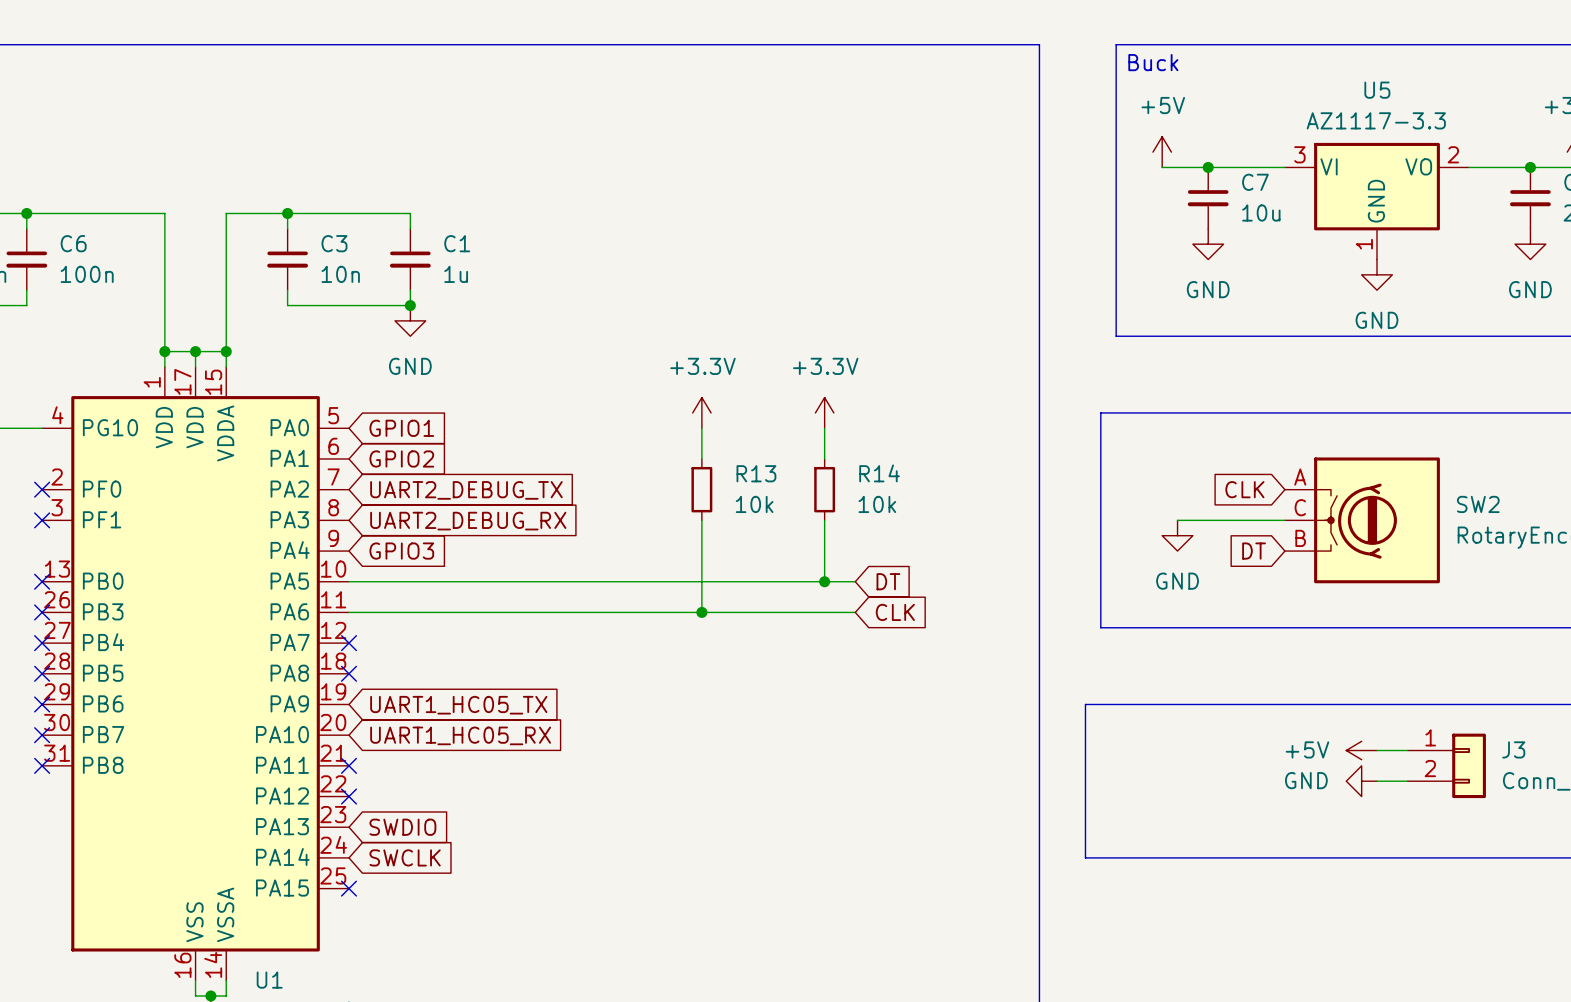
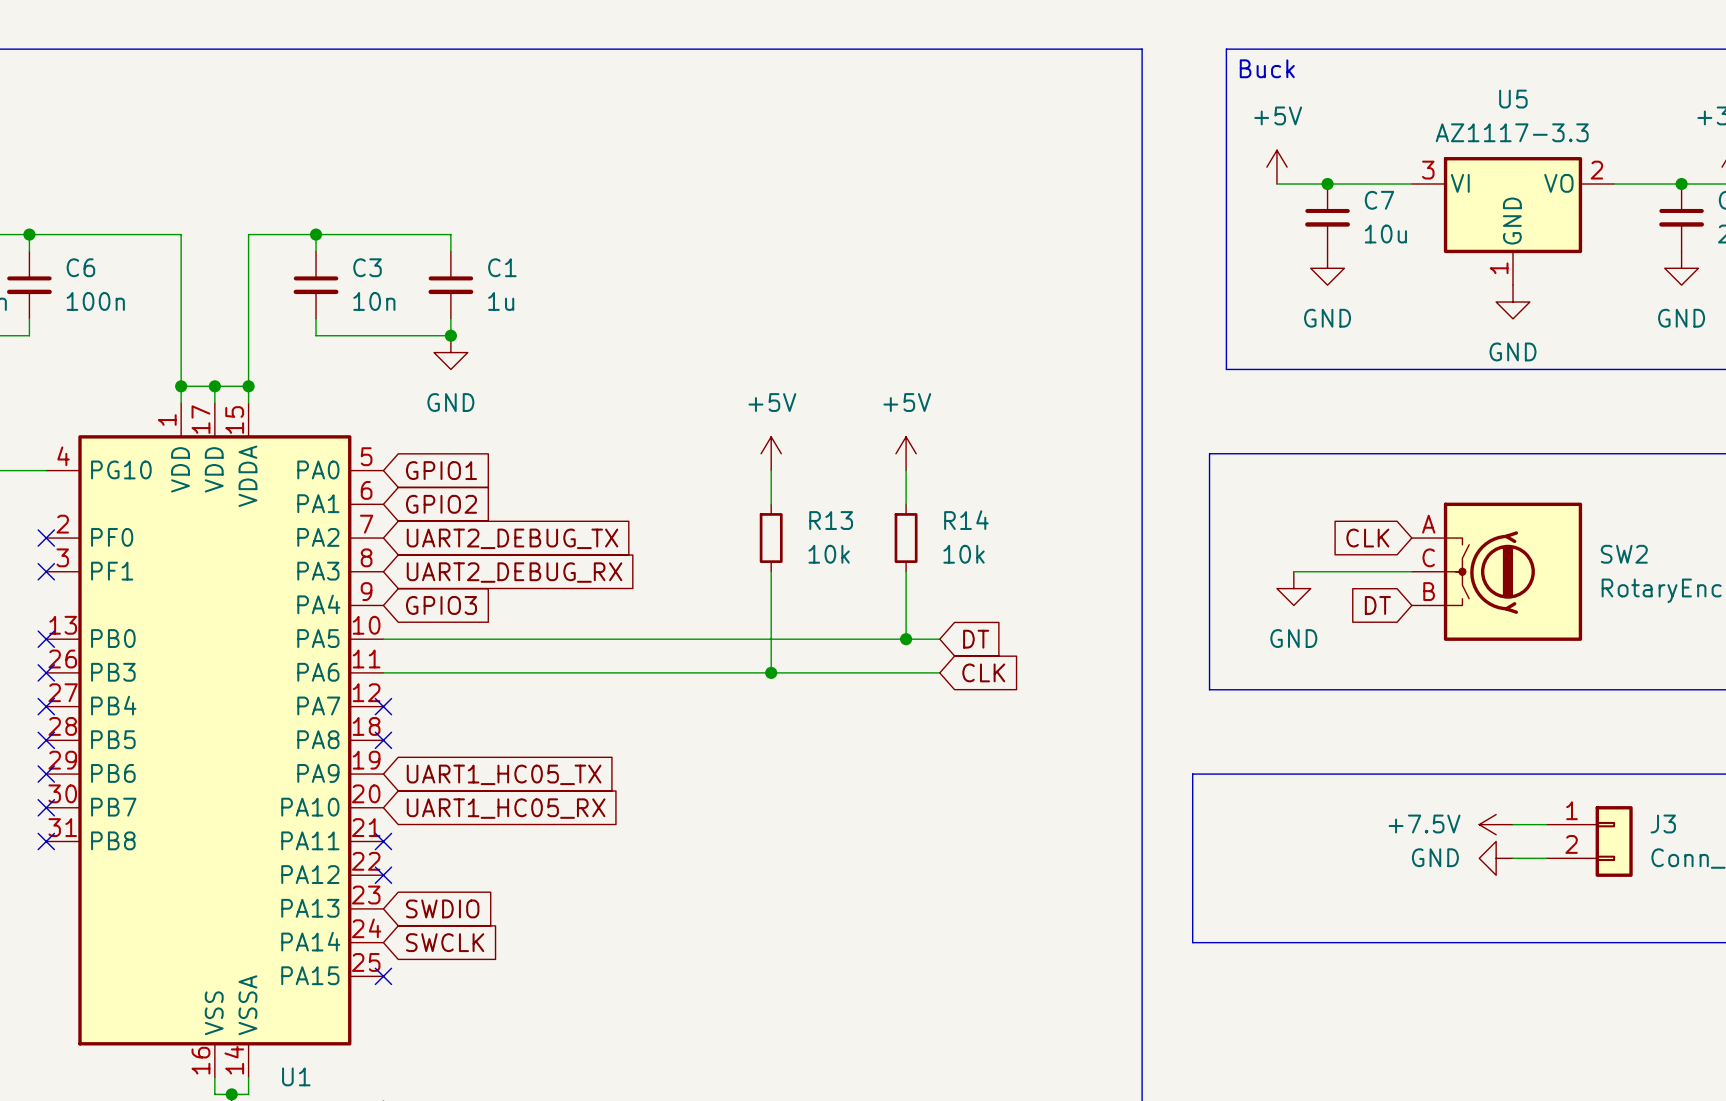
power symbol: +3.3V (701, 412) -> +5V (771, 453)
power symbol: +3.3V (824, 412) -> +5V (906, 453)
power symbol: +5V (1361, 750) -> +7.5V (1496, 824)

